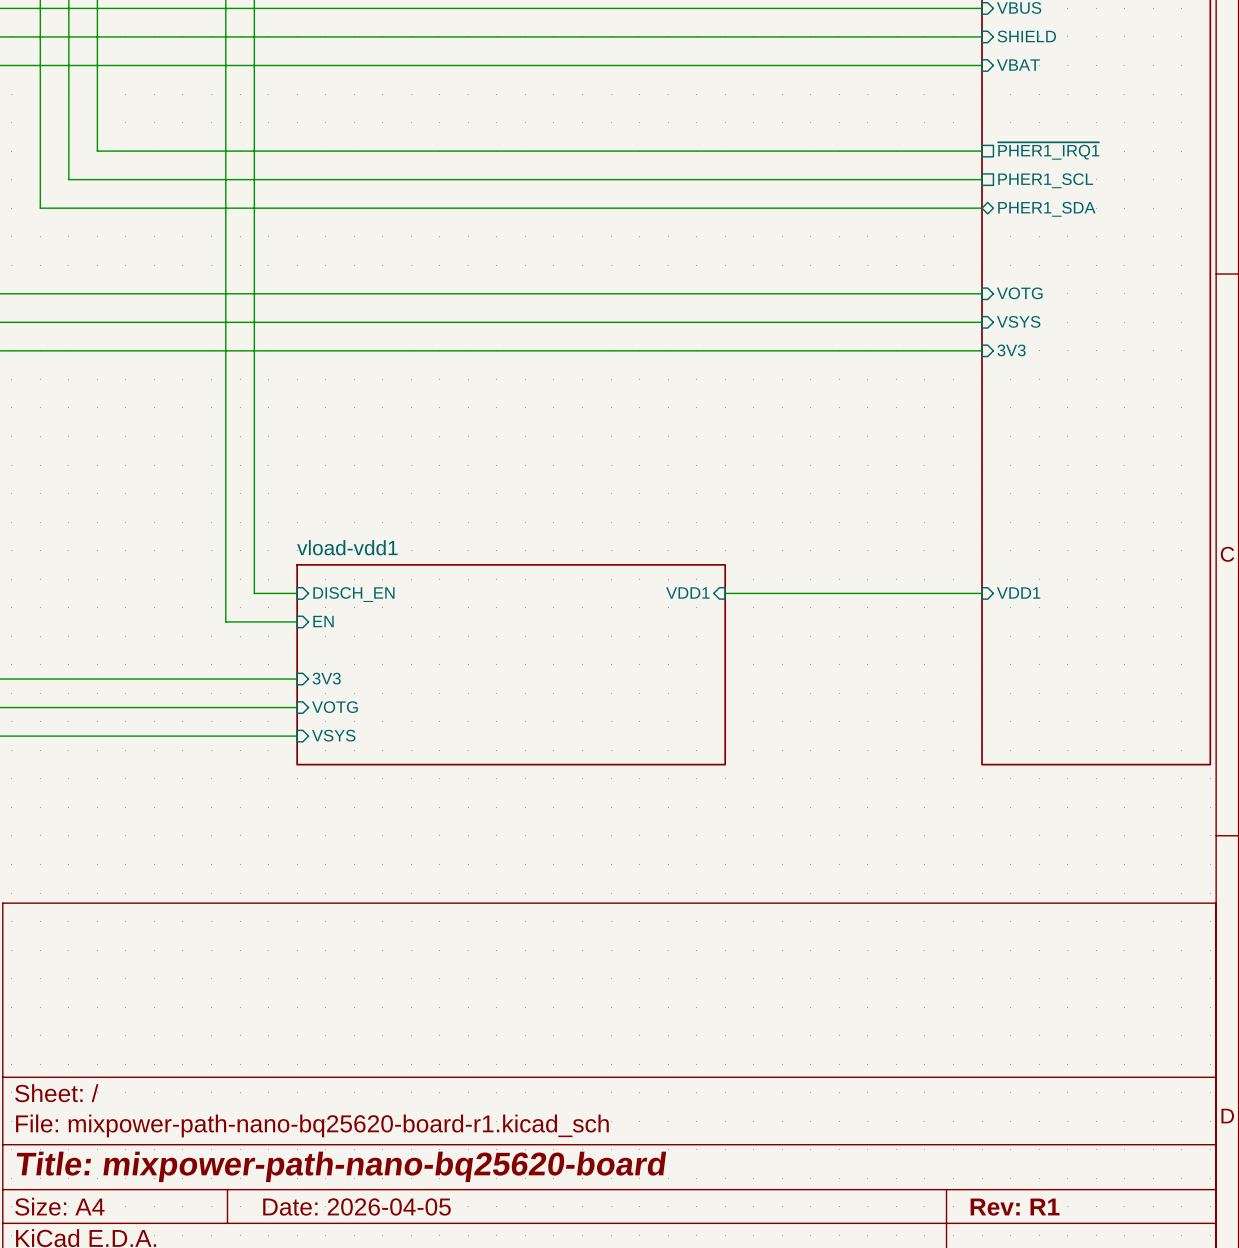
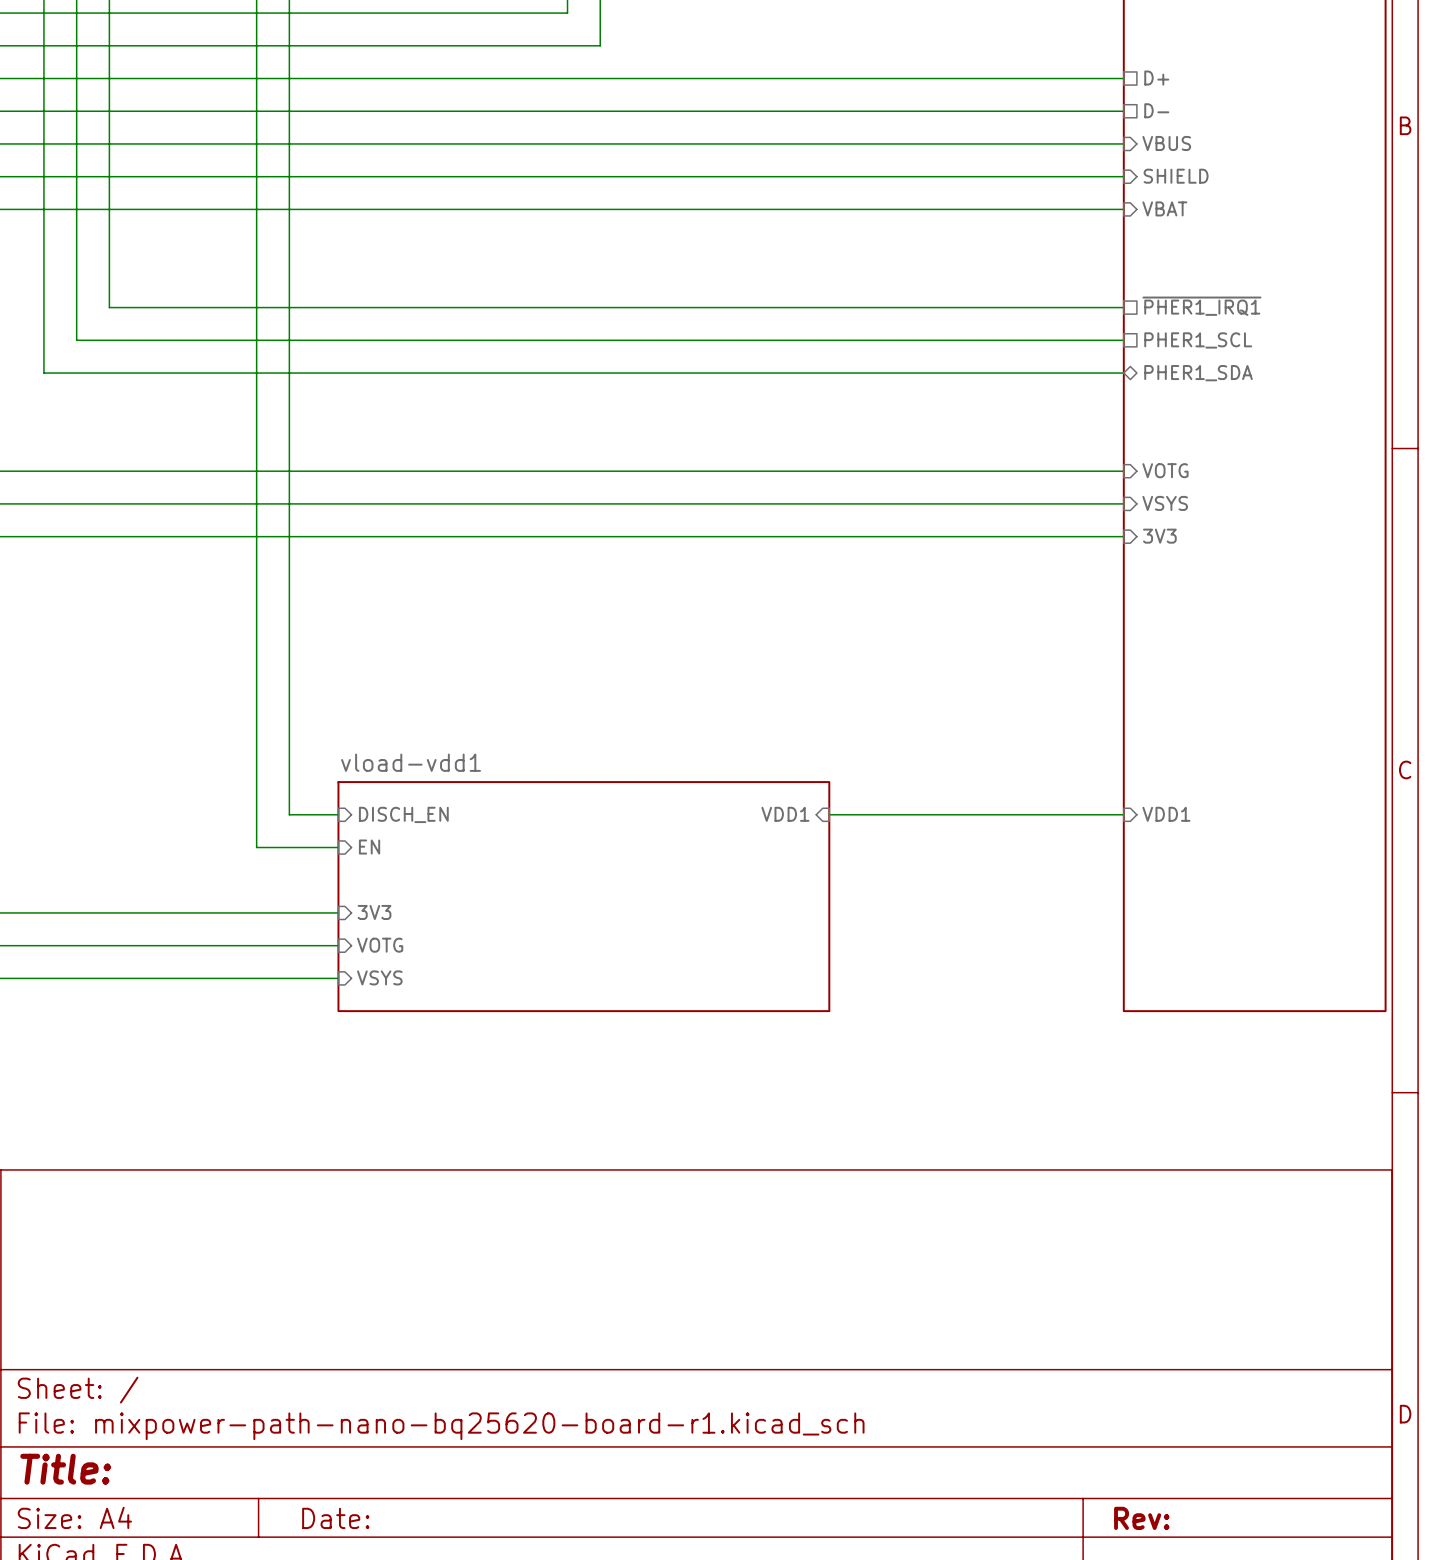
title block: Title: mixpower-path-nano-bq25620-board (341, 1166) -> Title: (65, 1469)
title block: Date: 2026-04-05 (357, 1206) -> Date: (335, 1518)
title block: Rev: R1 (1015, 1207) -> Rev: (1141, 1518)

